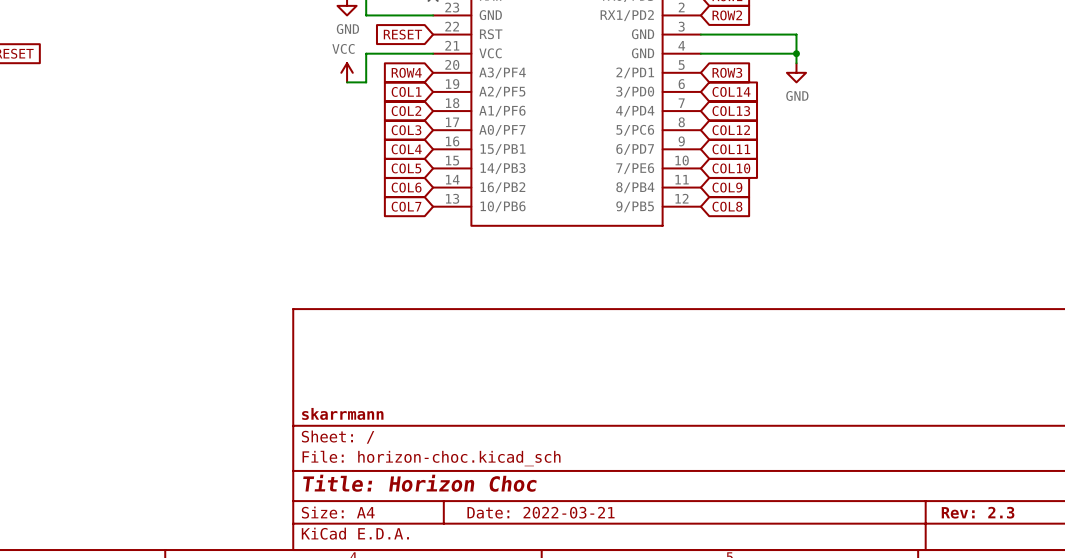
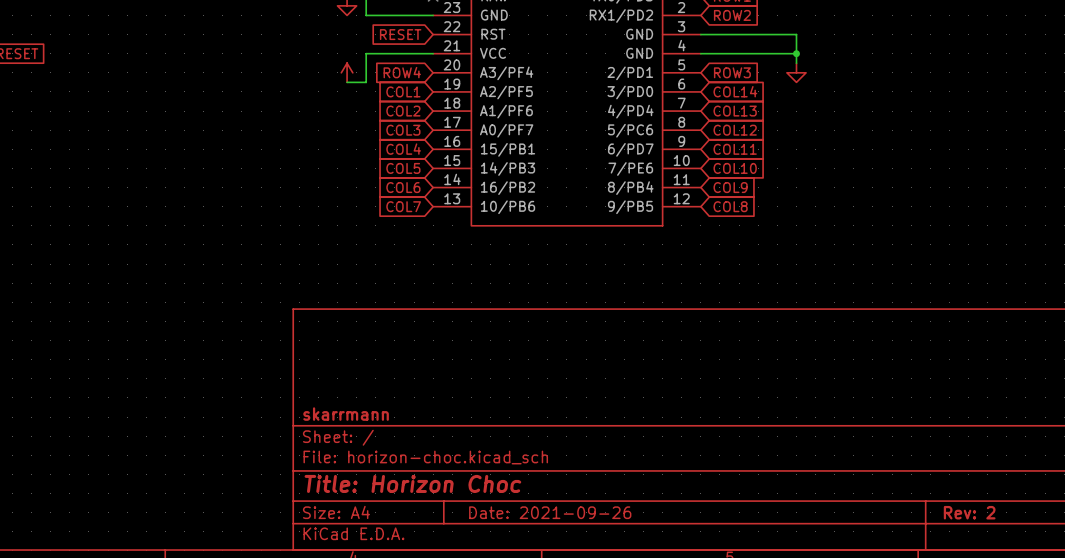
power symbol text: GND (347, 29) -> none
power symbol text: VCC (343, 48) -> none
power symbol text: GND (797, 95) -> none
title block: Date: 2022-03-21 (541, 512) -> Date: 2021-09-26 (550, 512)
title block: Rev: 2.3 (978, 512) -> Rev: 2 (969, 512)

